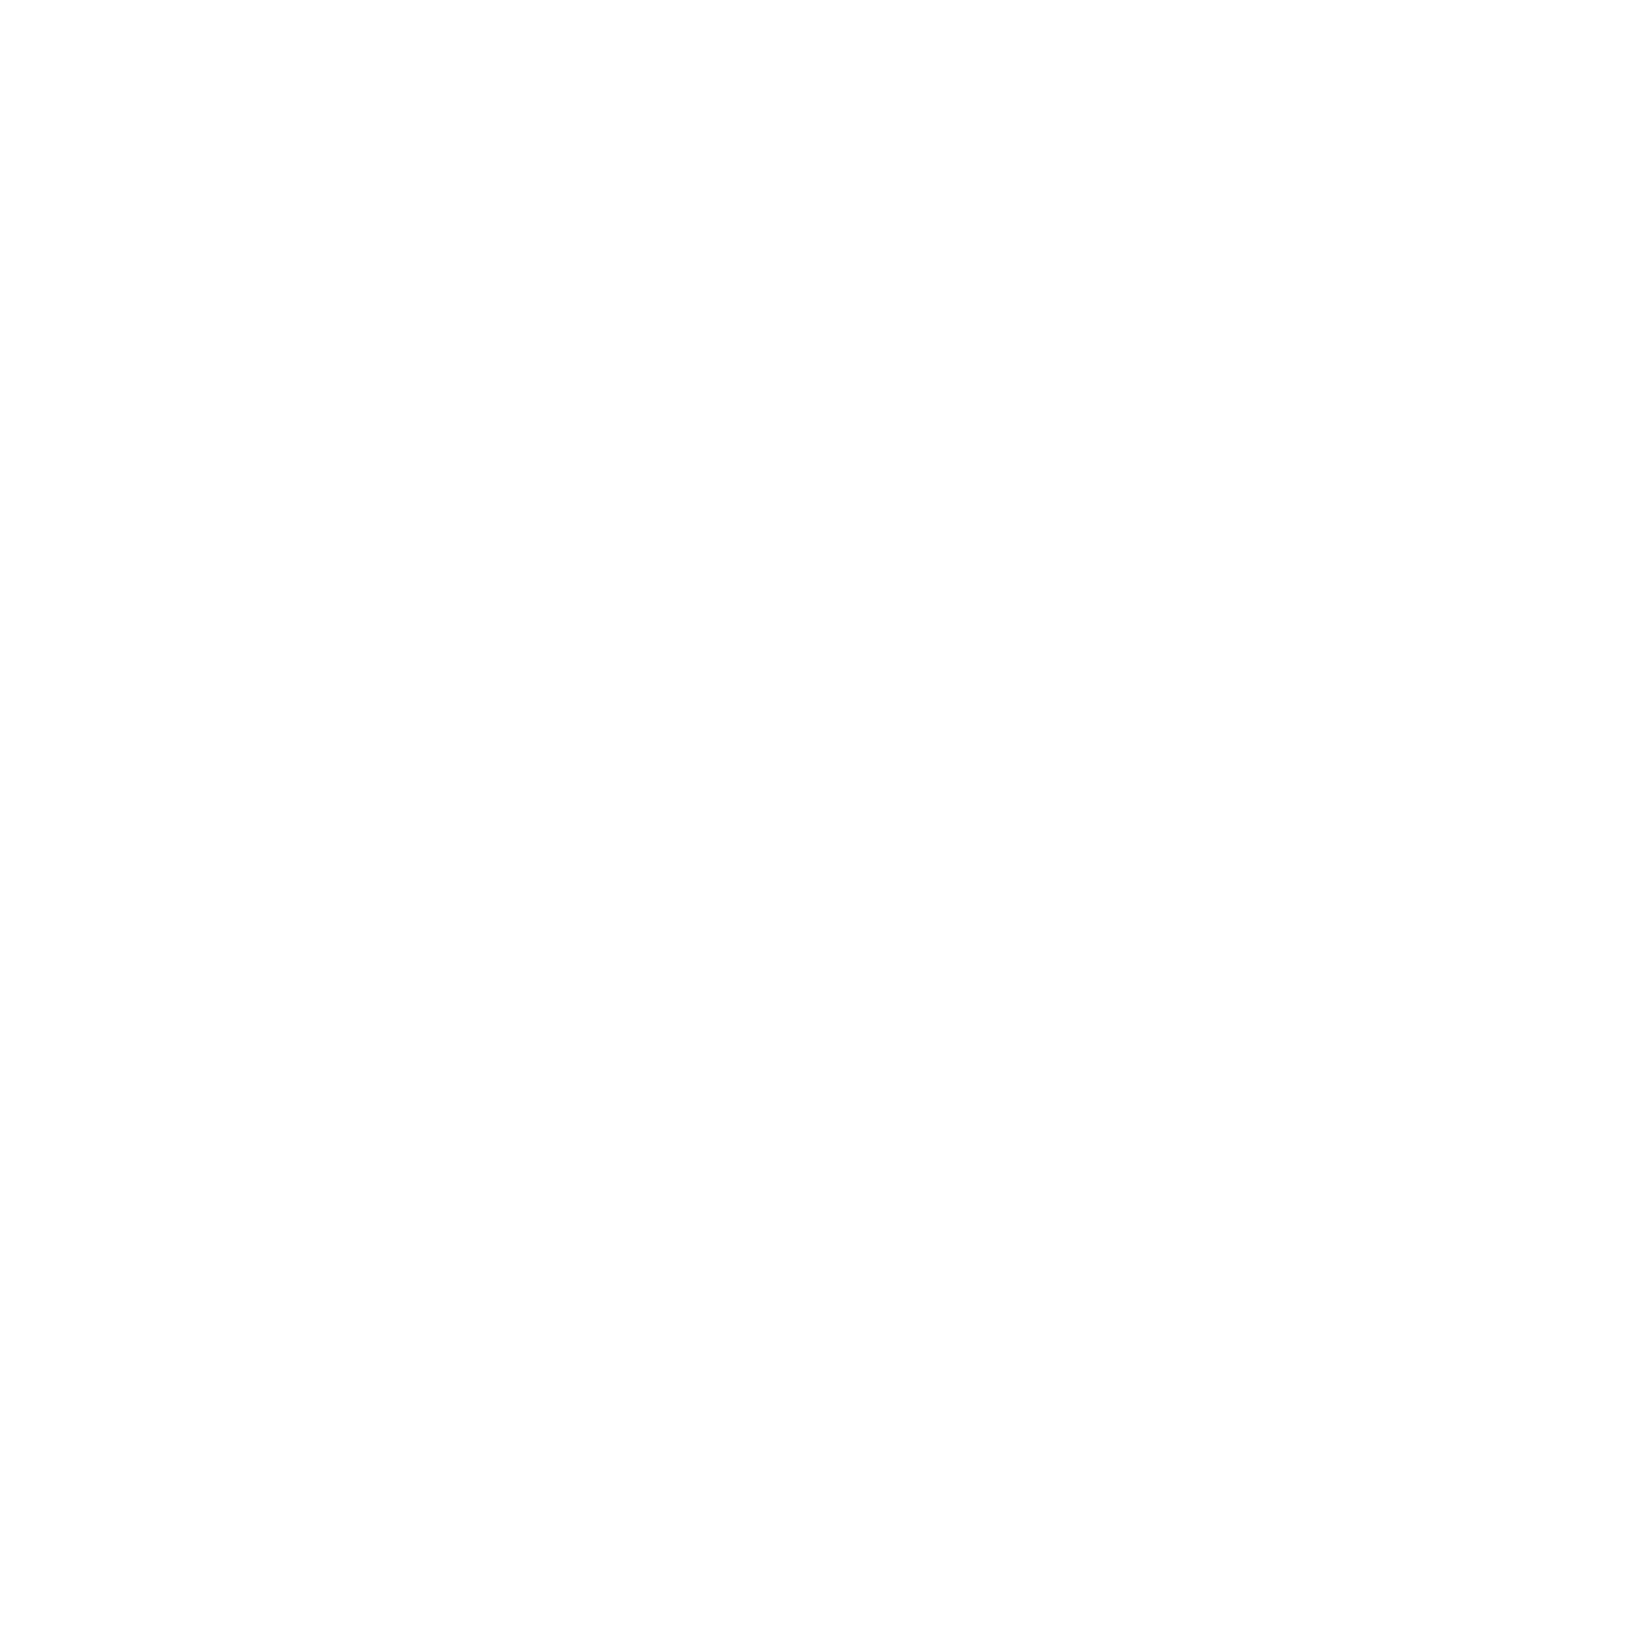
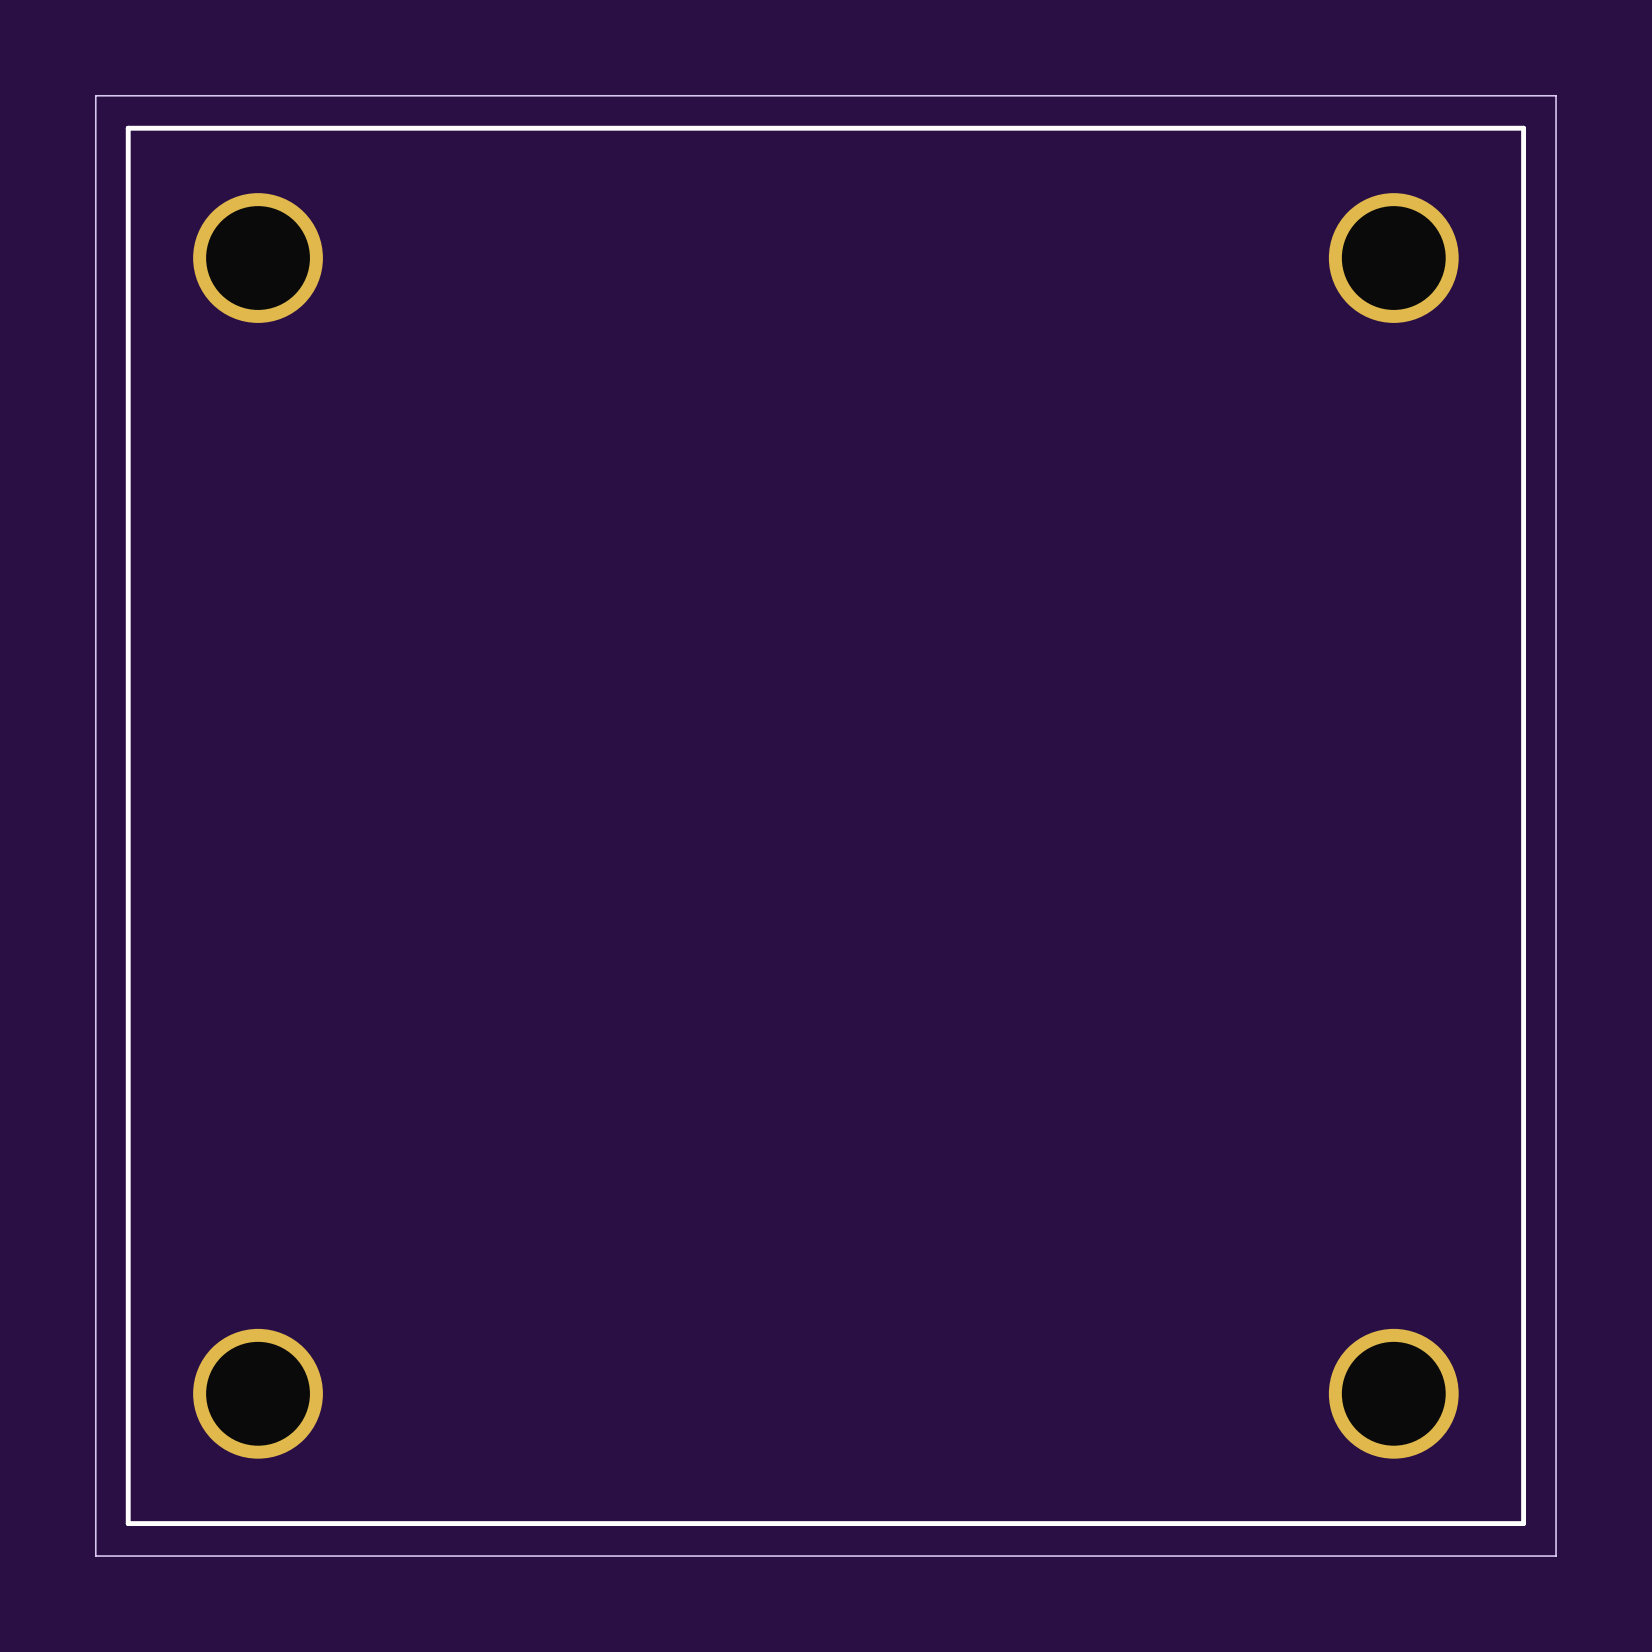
board edge: none -> (95, 95) (1556, 95) (1556, 1556) (95, 1556) (95, 95)
line: none -> (128, 128) (1523, 128) (1523, 1523) (128, 1523) (128, 128)
part: none -> (258, 258)
part: none -> (1393, 258)
part: none -> (258, 1393)
part: none -> (1393, 1393)

